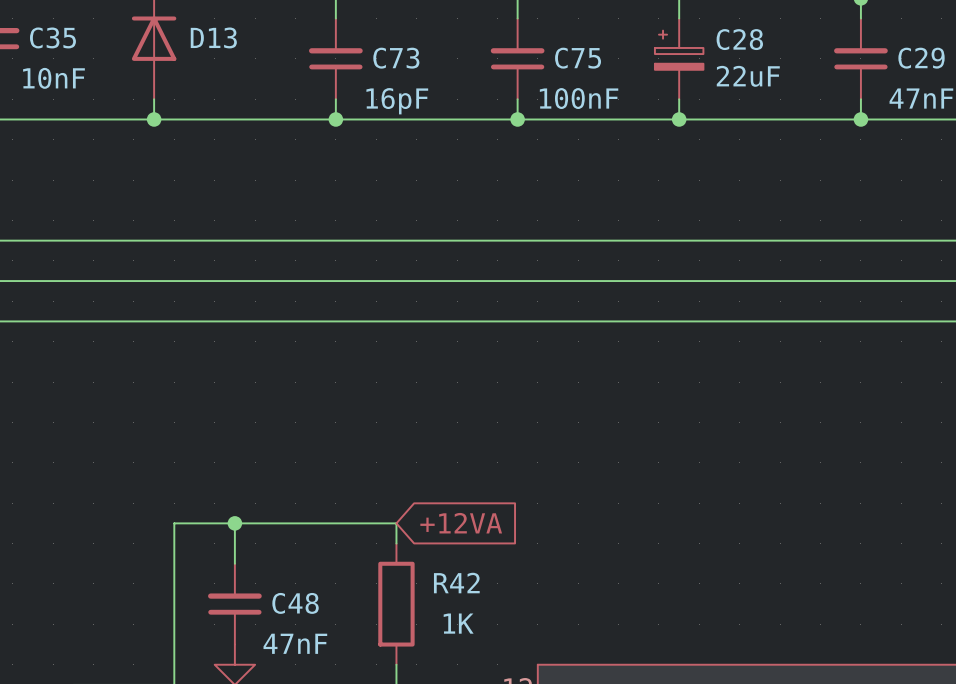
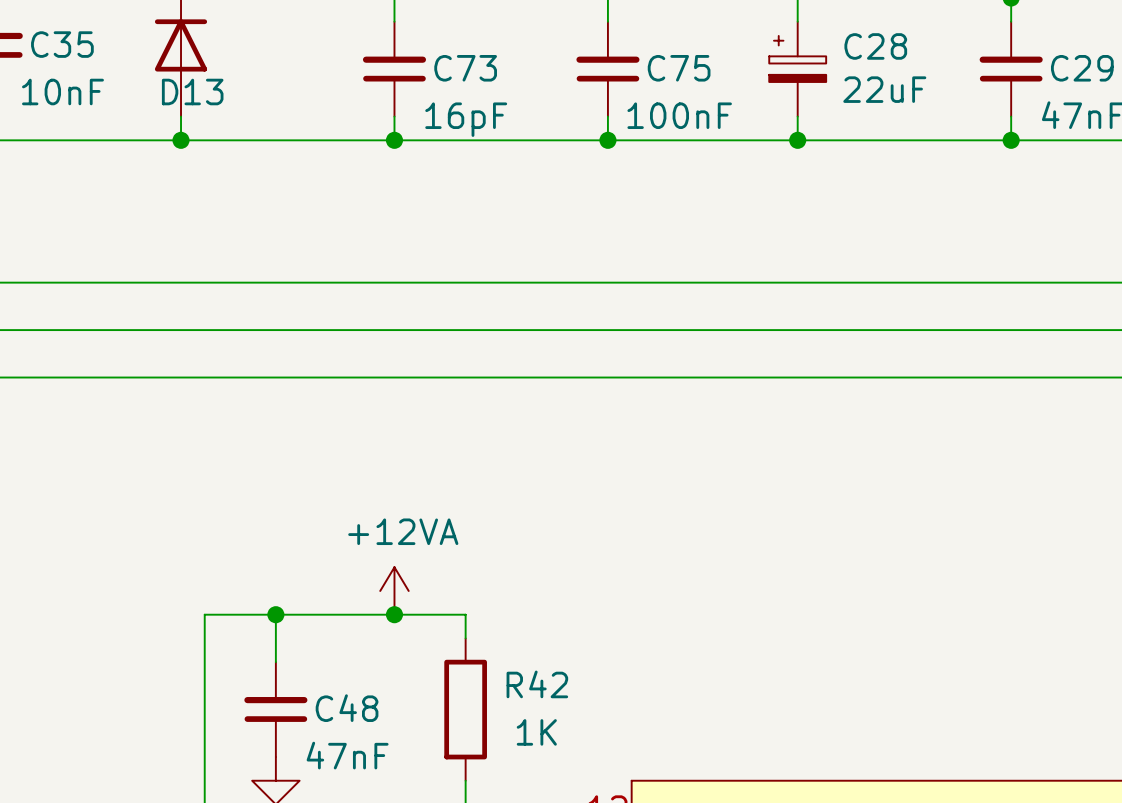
D13 name position: D13 (213, 37) -> D13 (192, 92)
power symbol: none -> +12VA (394, 590)
junction: none -> (394, 614)
global label: +12VA (461, 523) -> none

